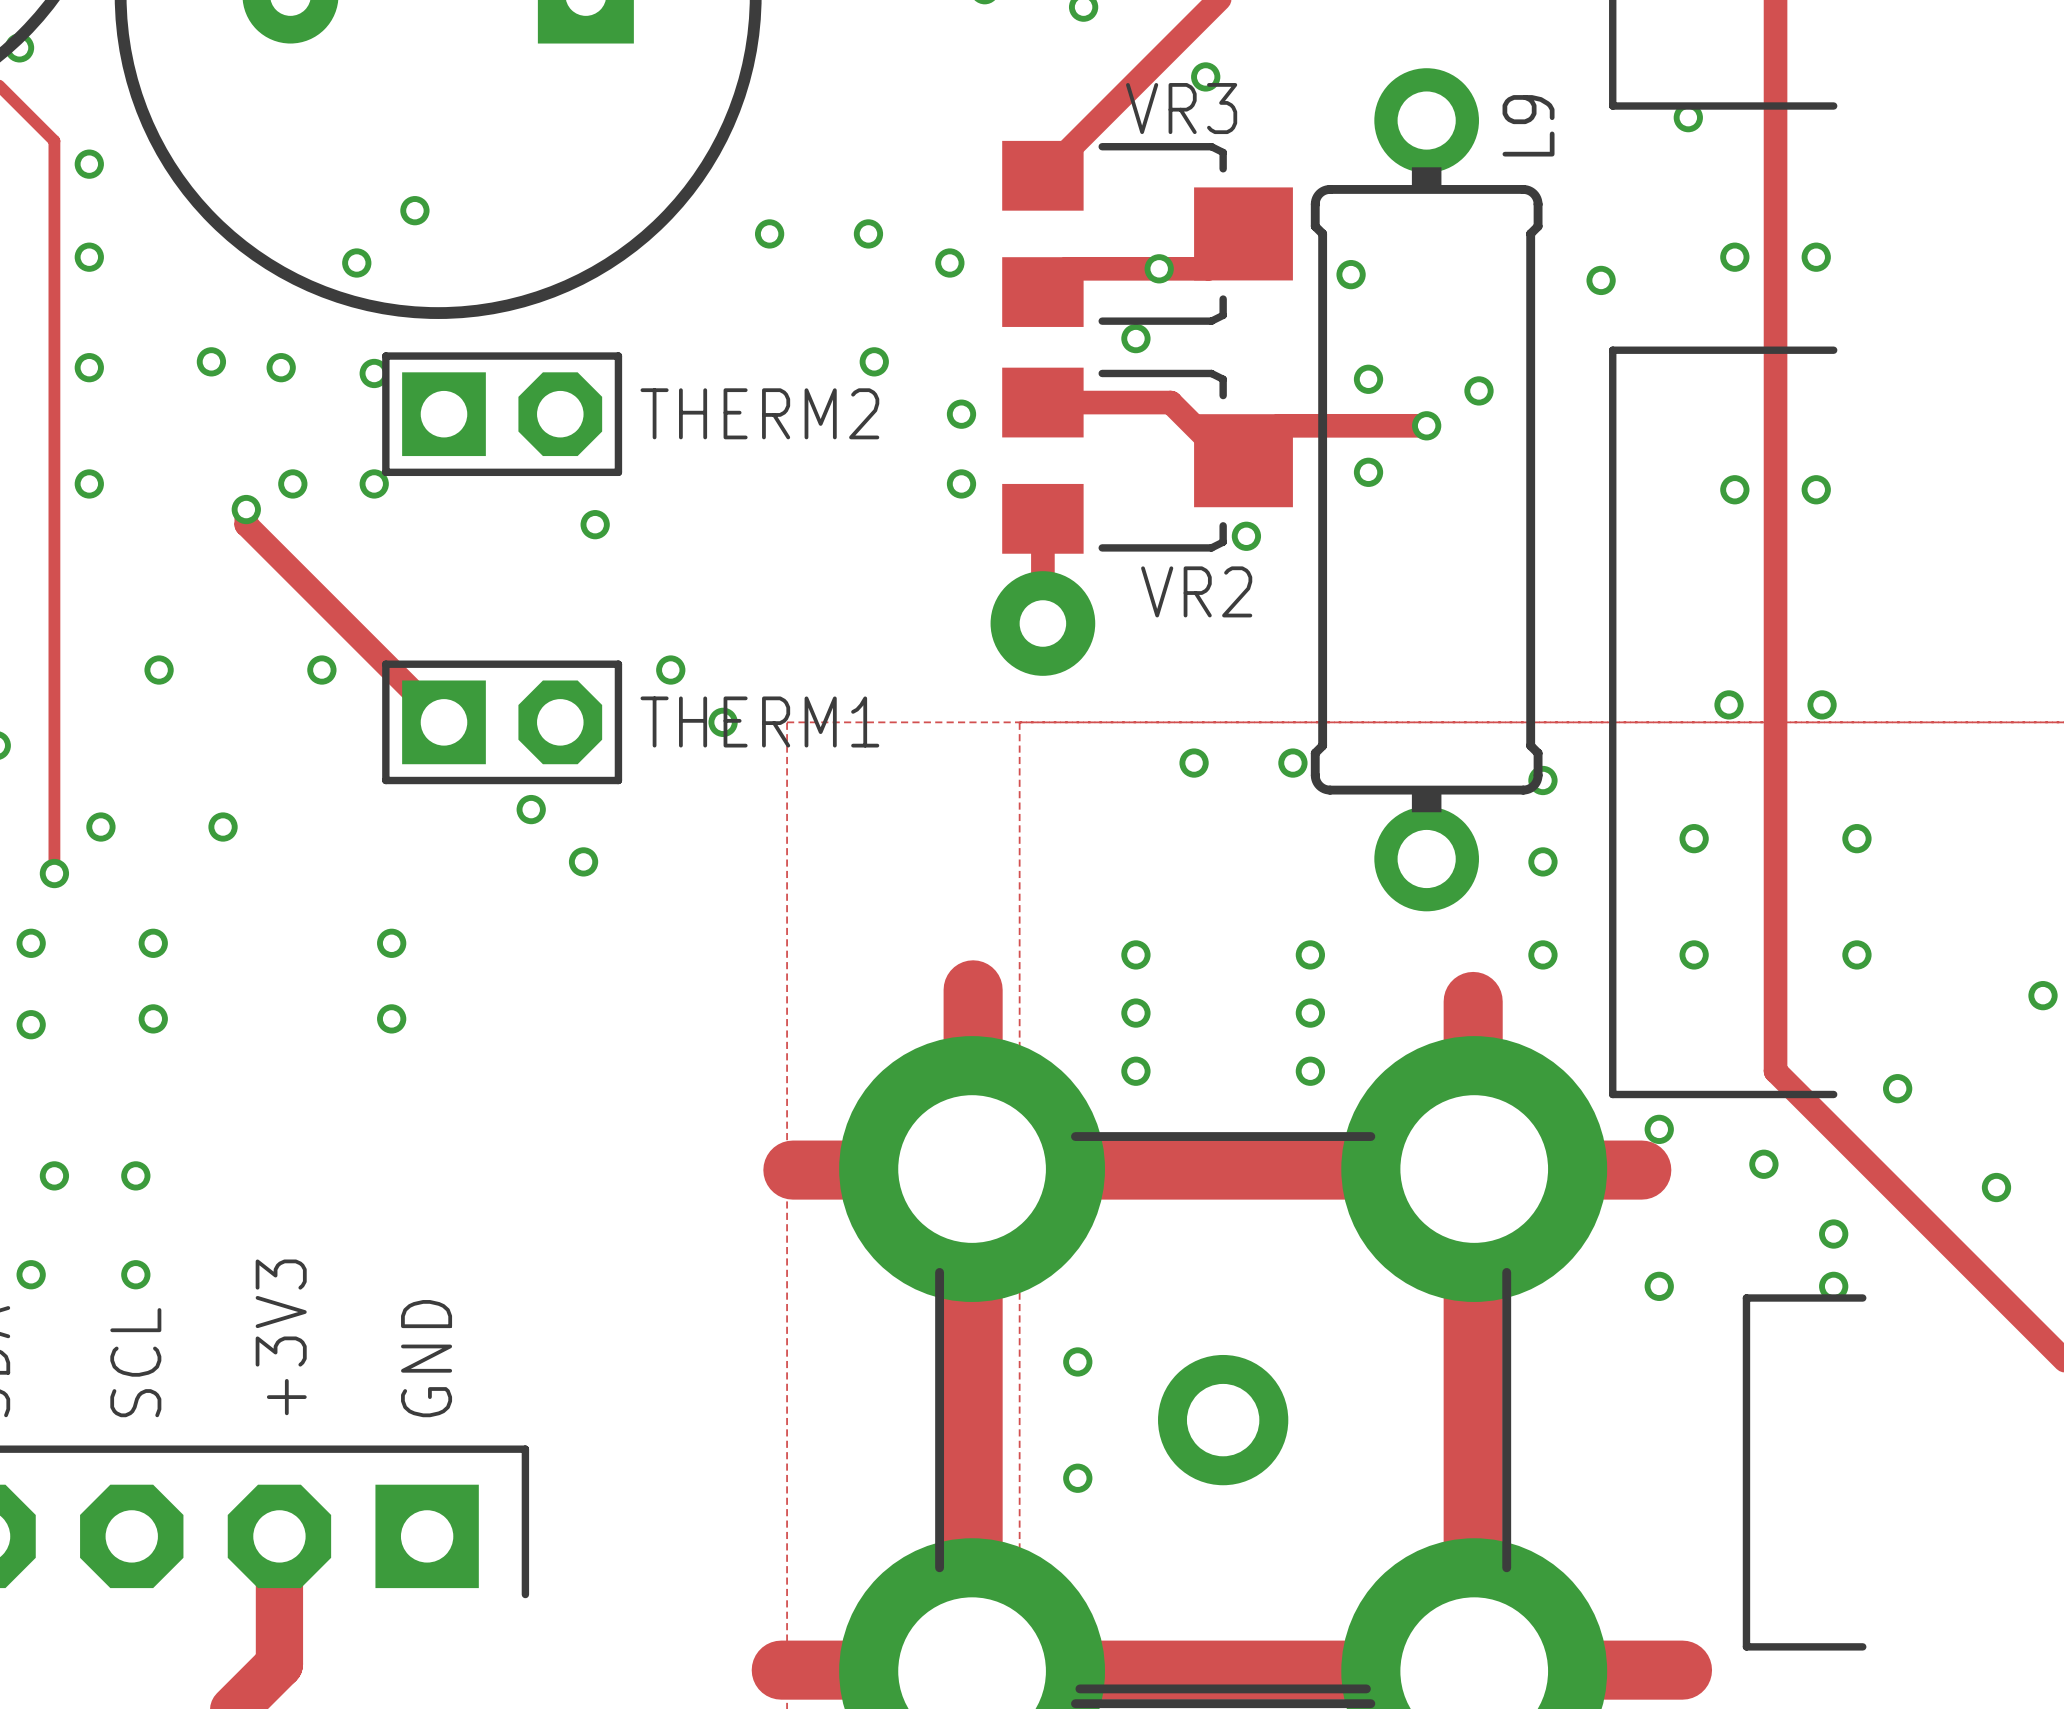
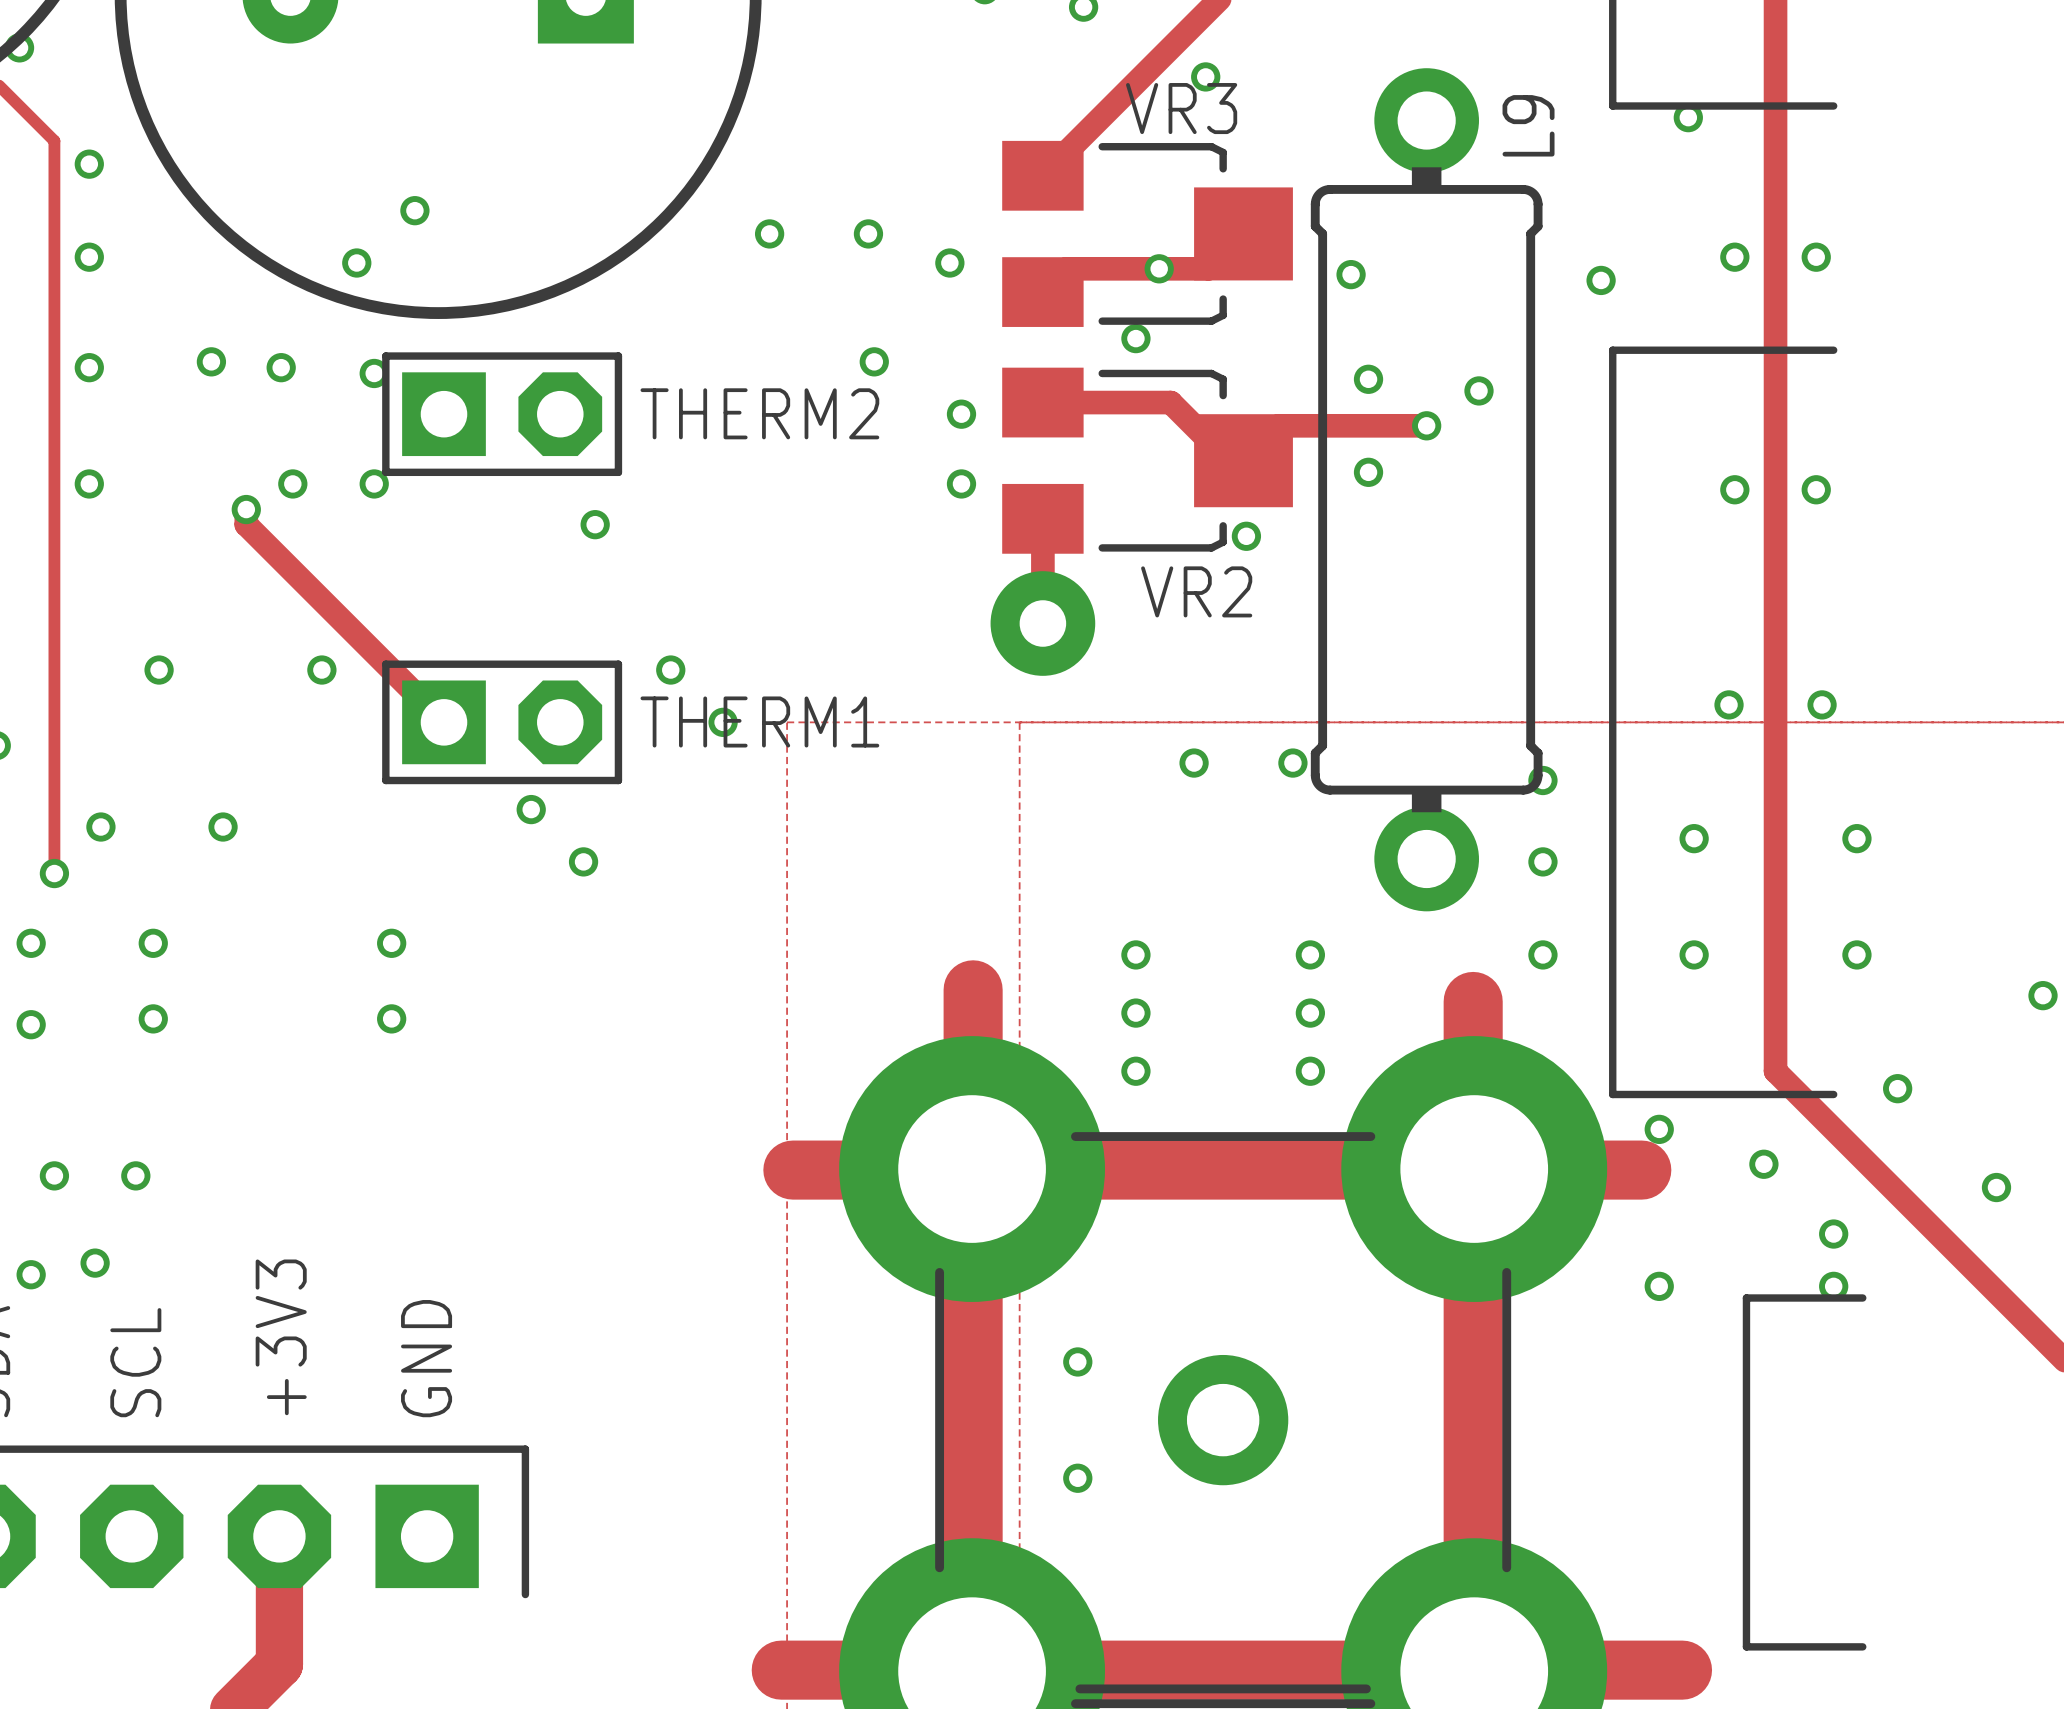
via position: (135, 1274) -> (95, 1263)

